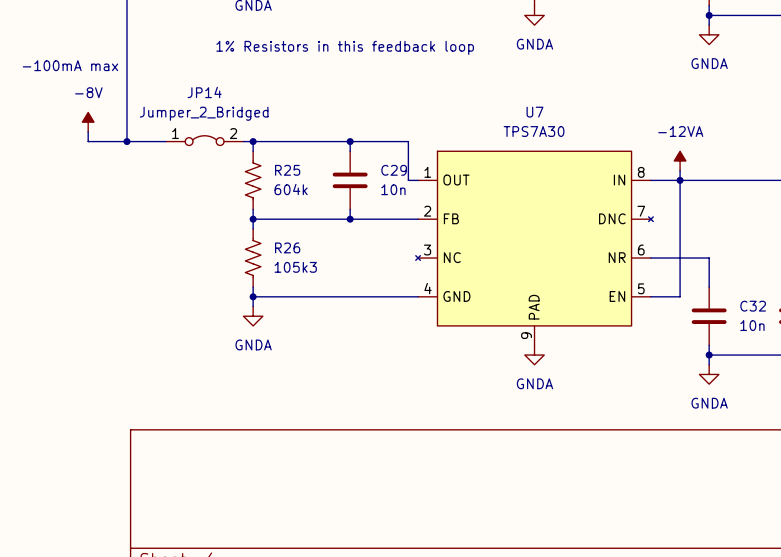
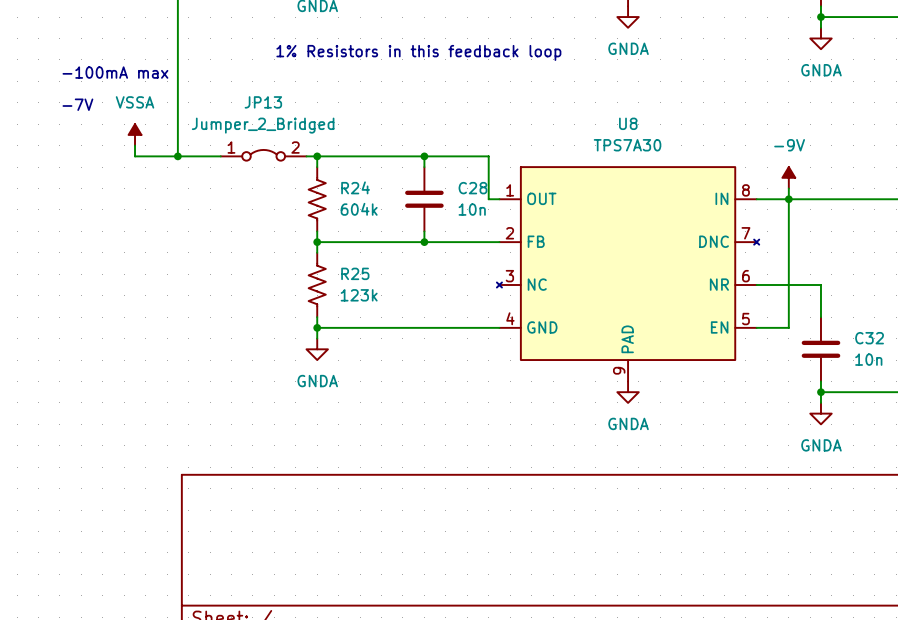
JP14 name: JP14 (204, 92) -> JP13 (263, 102)
text: none -> -7V (77, 104)
U7 name: U7 (534, 112) -> U8 (628, 123)
power symbol: -8V (88, 122) -> VSSA (135, 134)
power symbol: -12VA (680, 160) -> -9V (788, 177)
R25 name: R25 (287, 170) -> R24 (355, 187)
C29 name: C29 (394, 170) -> C28 (472, 188)
R26 name: R26 (287, 247) -> R25 (355, 273)
R26 value: 105k3 (295, 267) -> 123k (359, 295)

